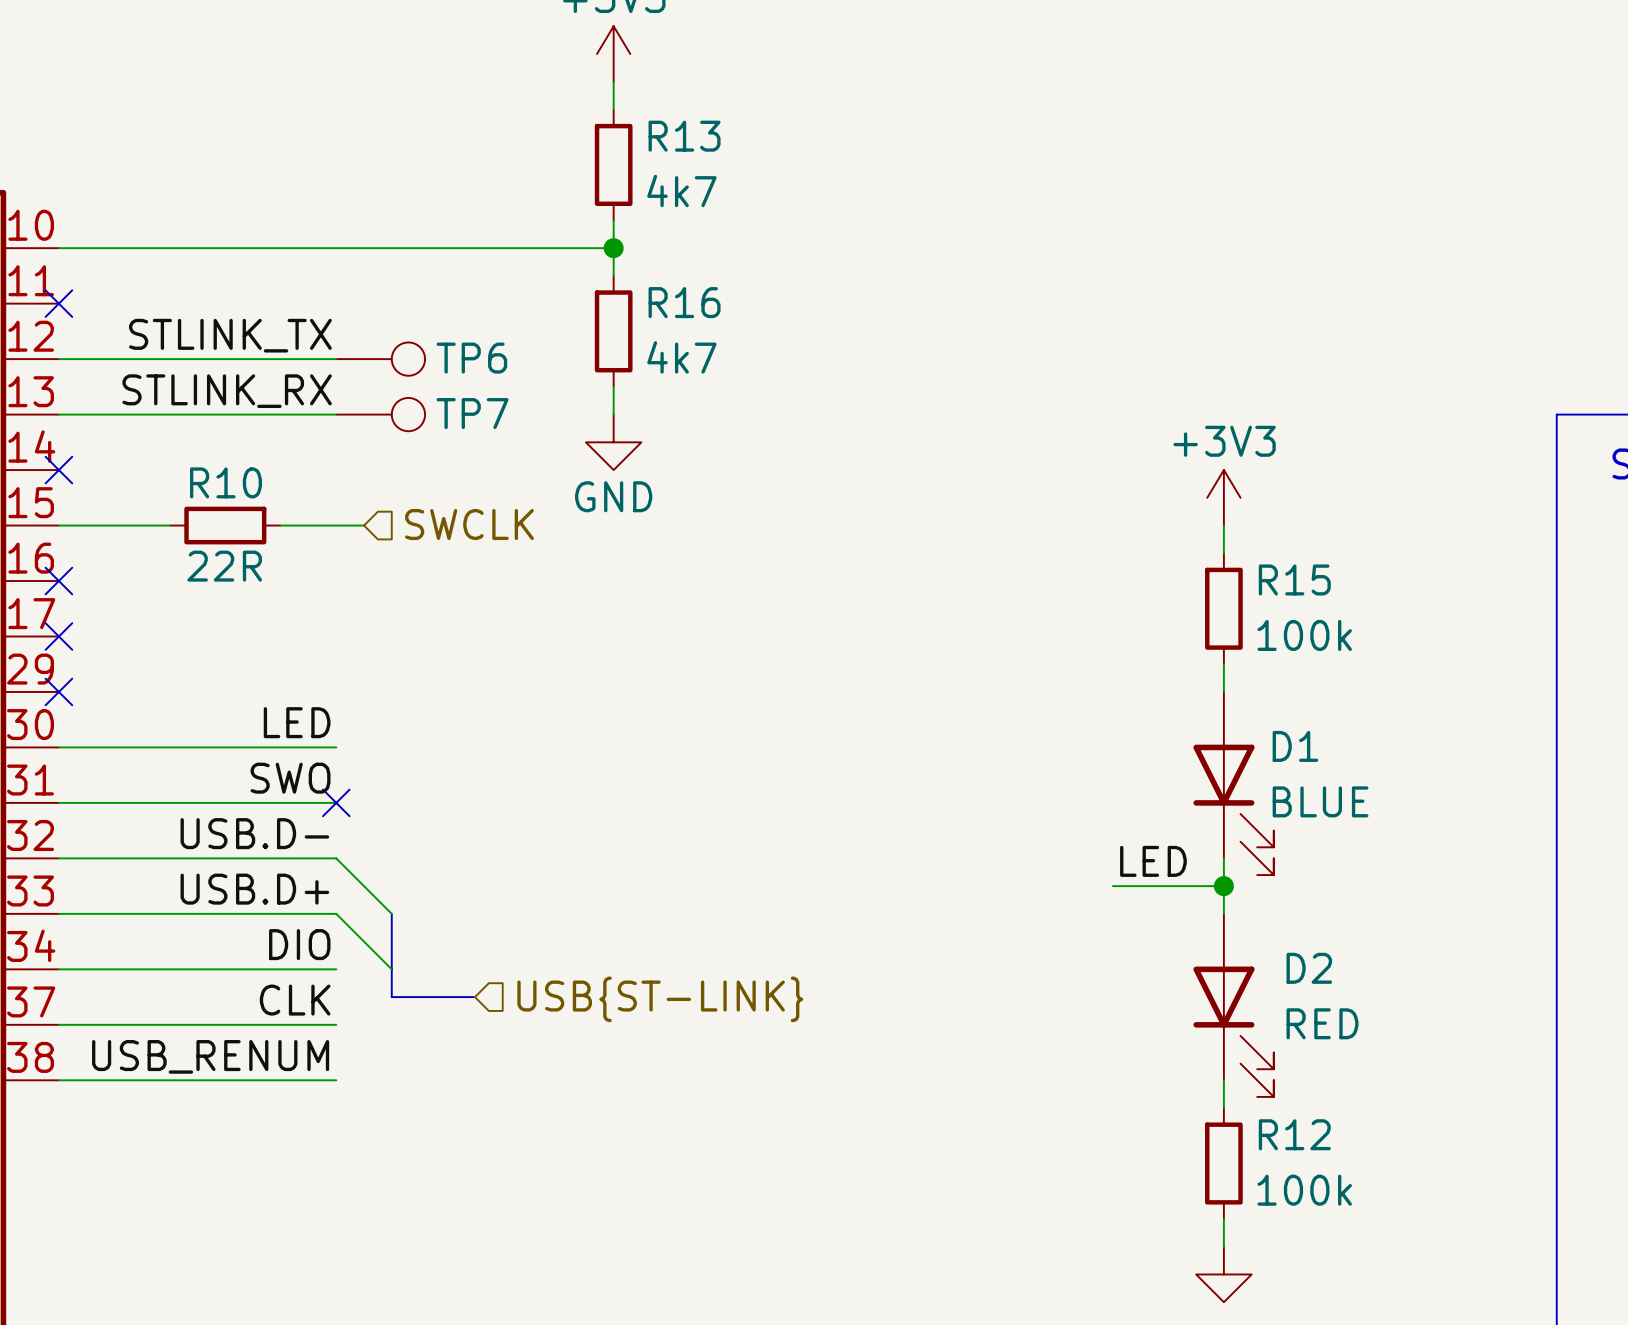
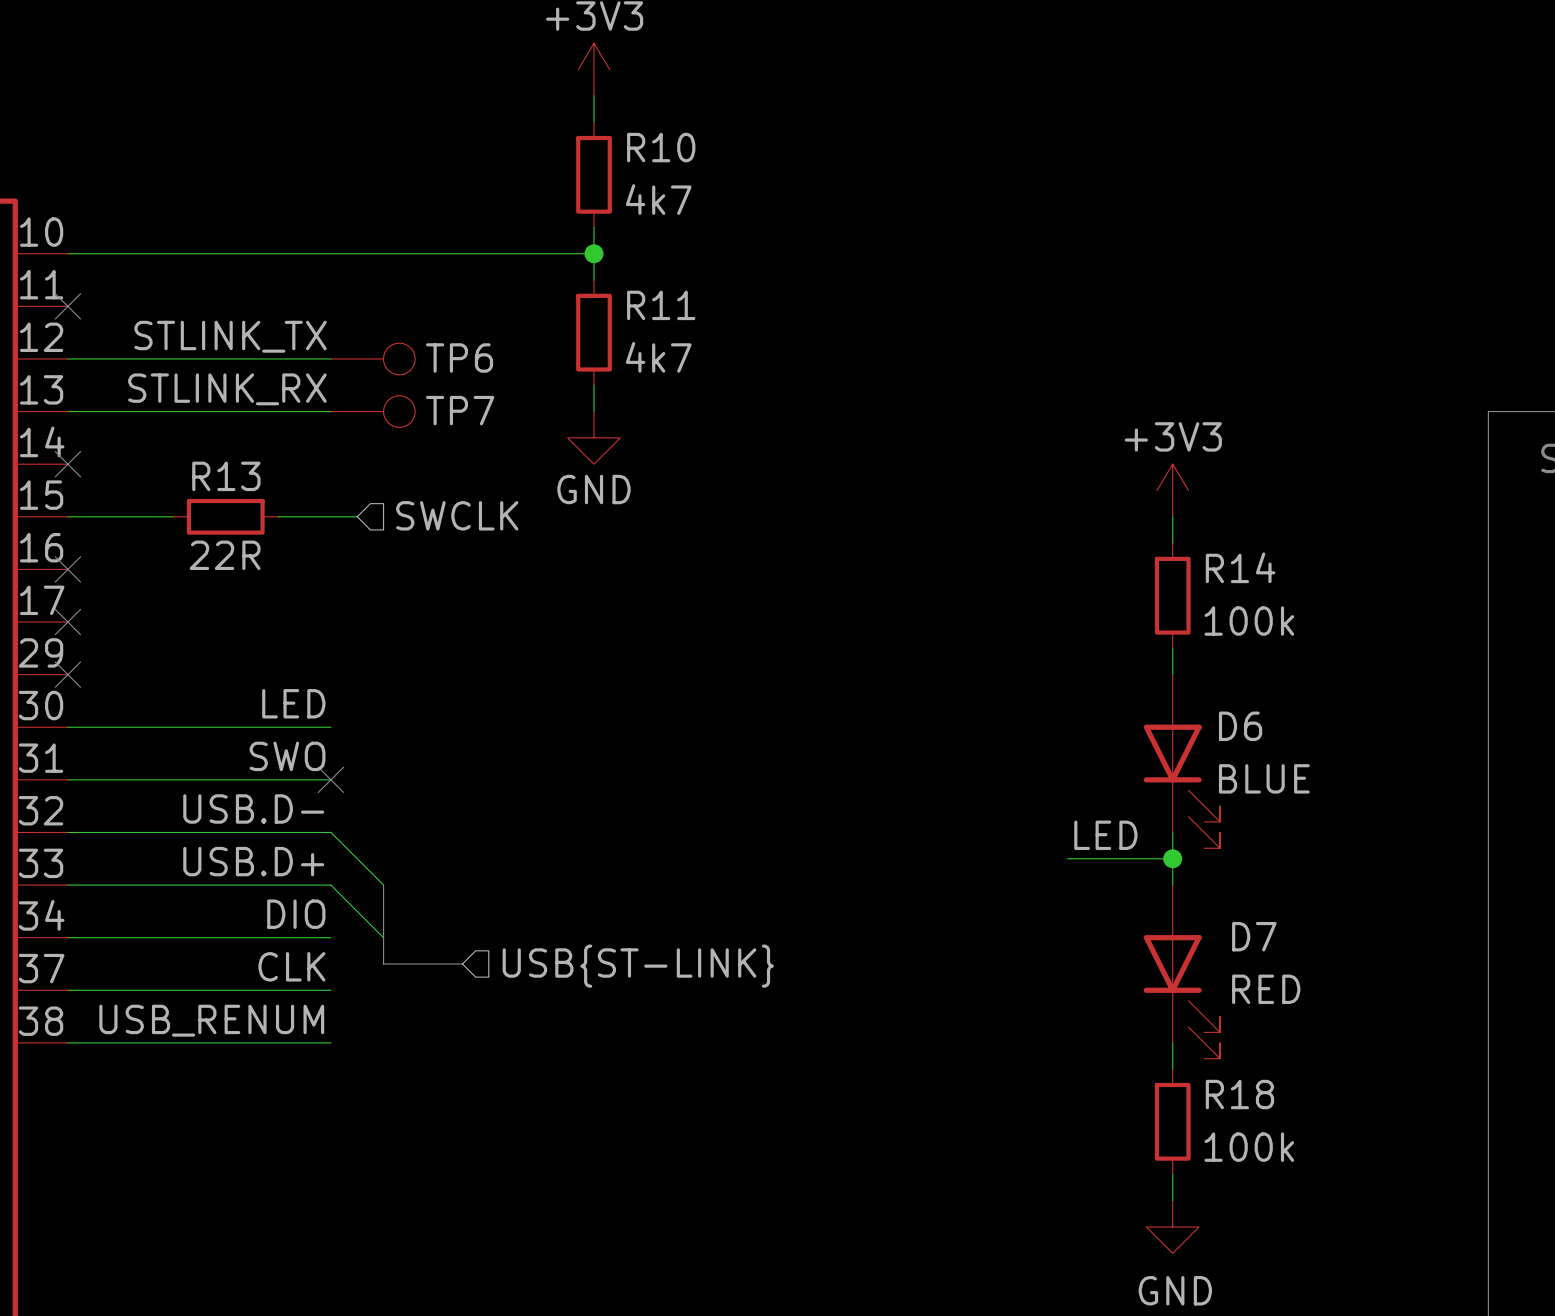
R13 name: R13 (684, 136) -> R10 (661, 147)
R16 name: R16 (684, 302) -> R11 (661, 305)
R10 name: R10 (226, 482) -> R13 (226, 476)
R15 name: R15 (1294, 579) -> R14 (1240, 567)
D1 name: D1 (1295, 746) -> D6 (1240, 726)
D2 name: D2 (1309, 968) -> D7 (1254, 936)
R12 name: R12 (1294, 1134) -> R18 (1239, 1094)

